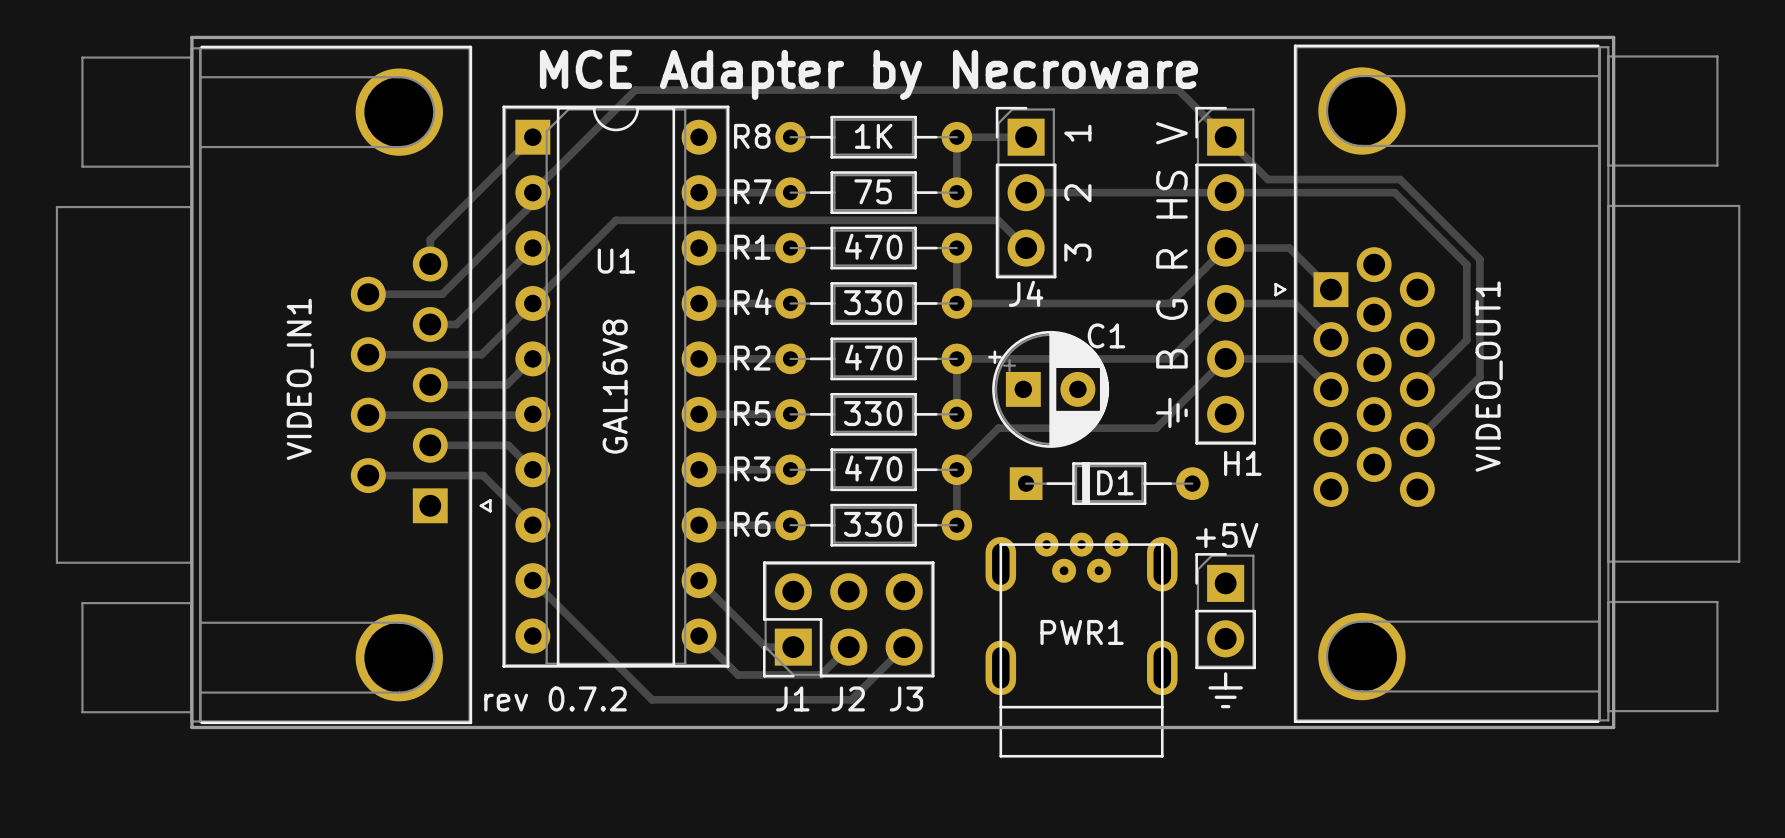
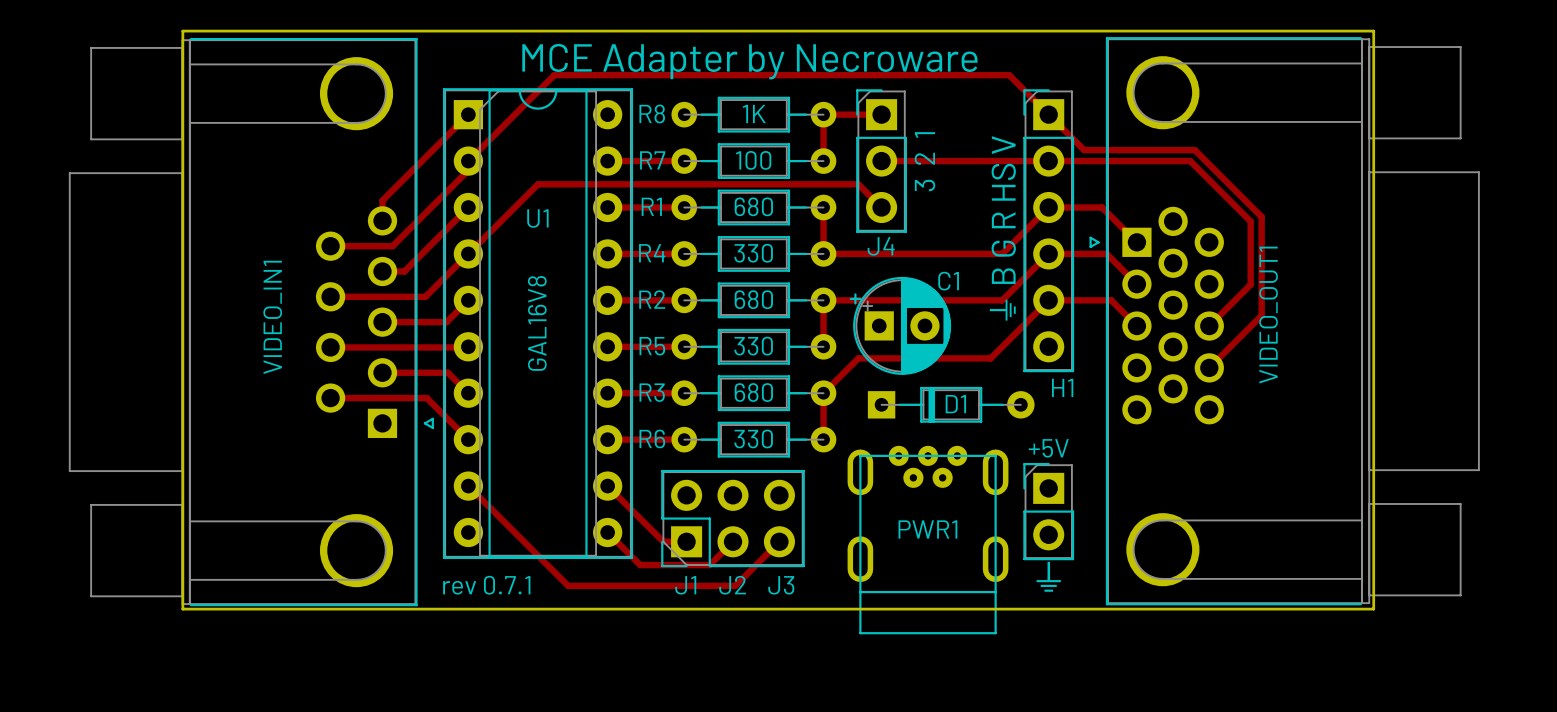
R7 value: 75 (873, 191) -> 100 (753, 160)
R1 value: 470 (873, 246) -> 680 (753, 206)
R2 value: 470 (873, 357) -> 680 (753, 299)
R3 value: 470 (873, 468) -> 680 (753, 392)
text: rev 0.7.2 (555, 698) -> rev 0.7.1 (486, 585)

